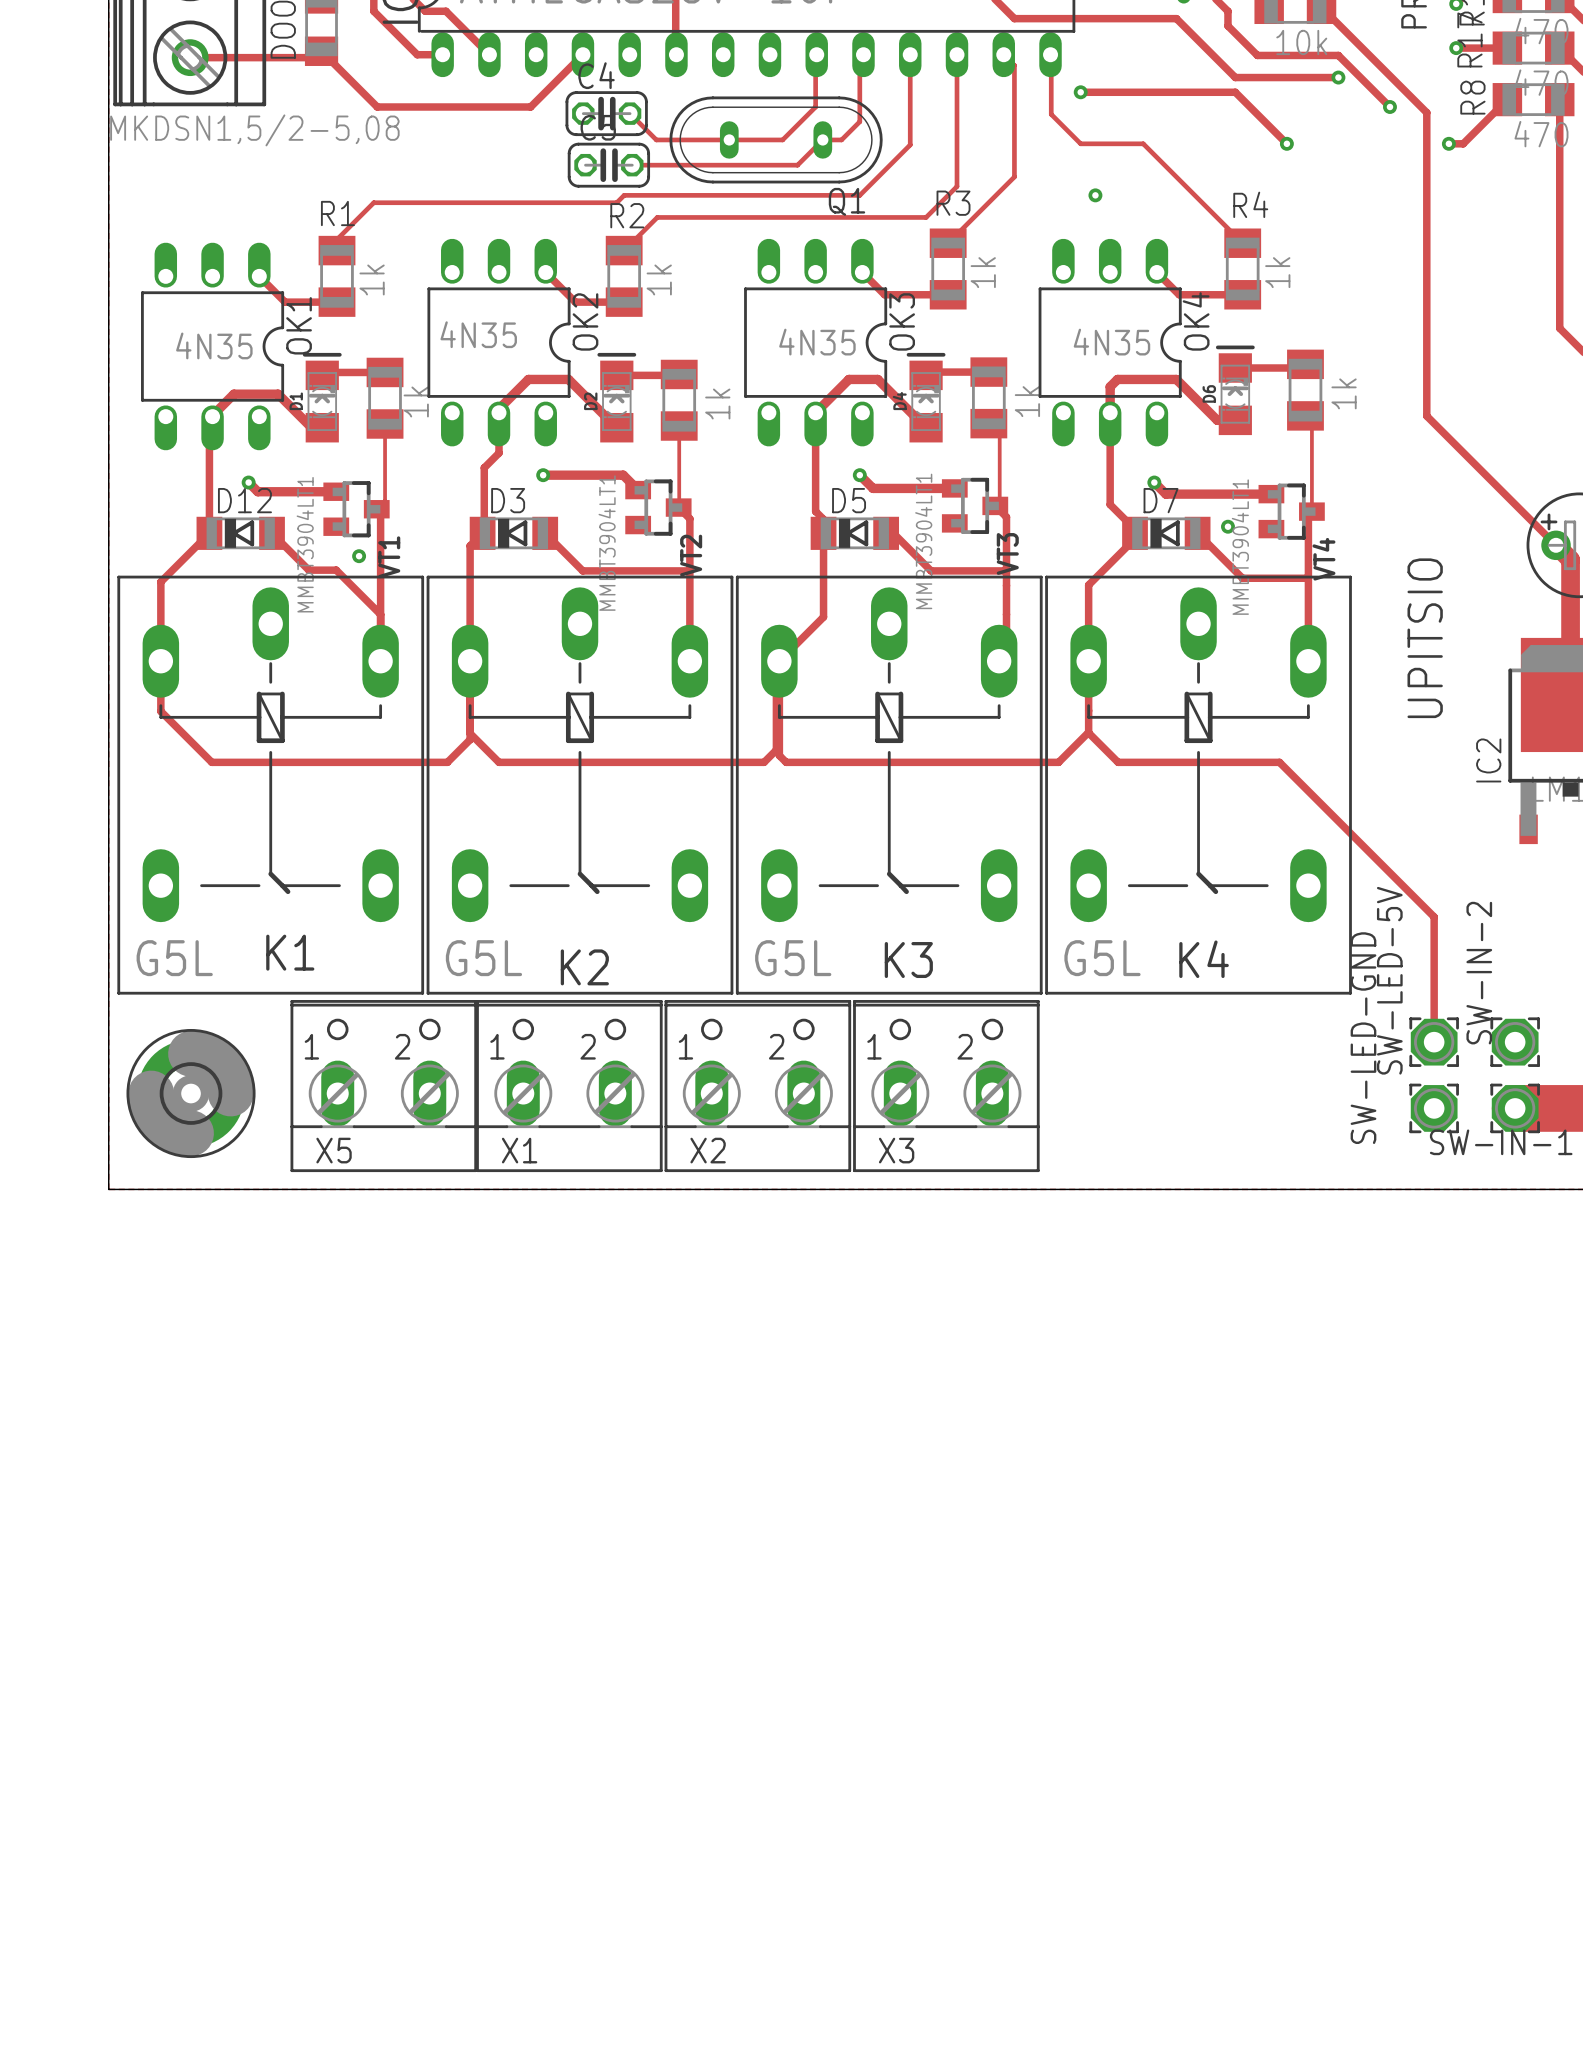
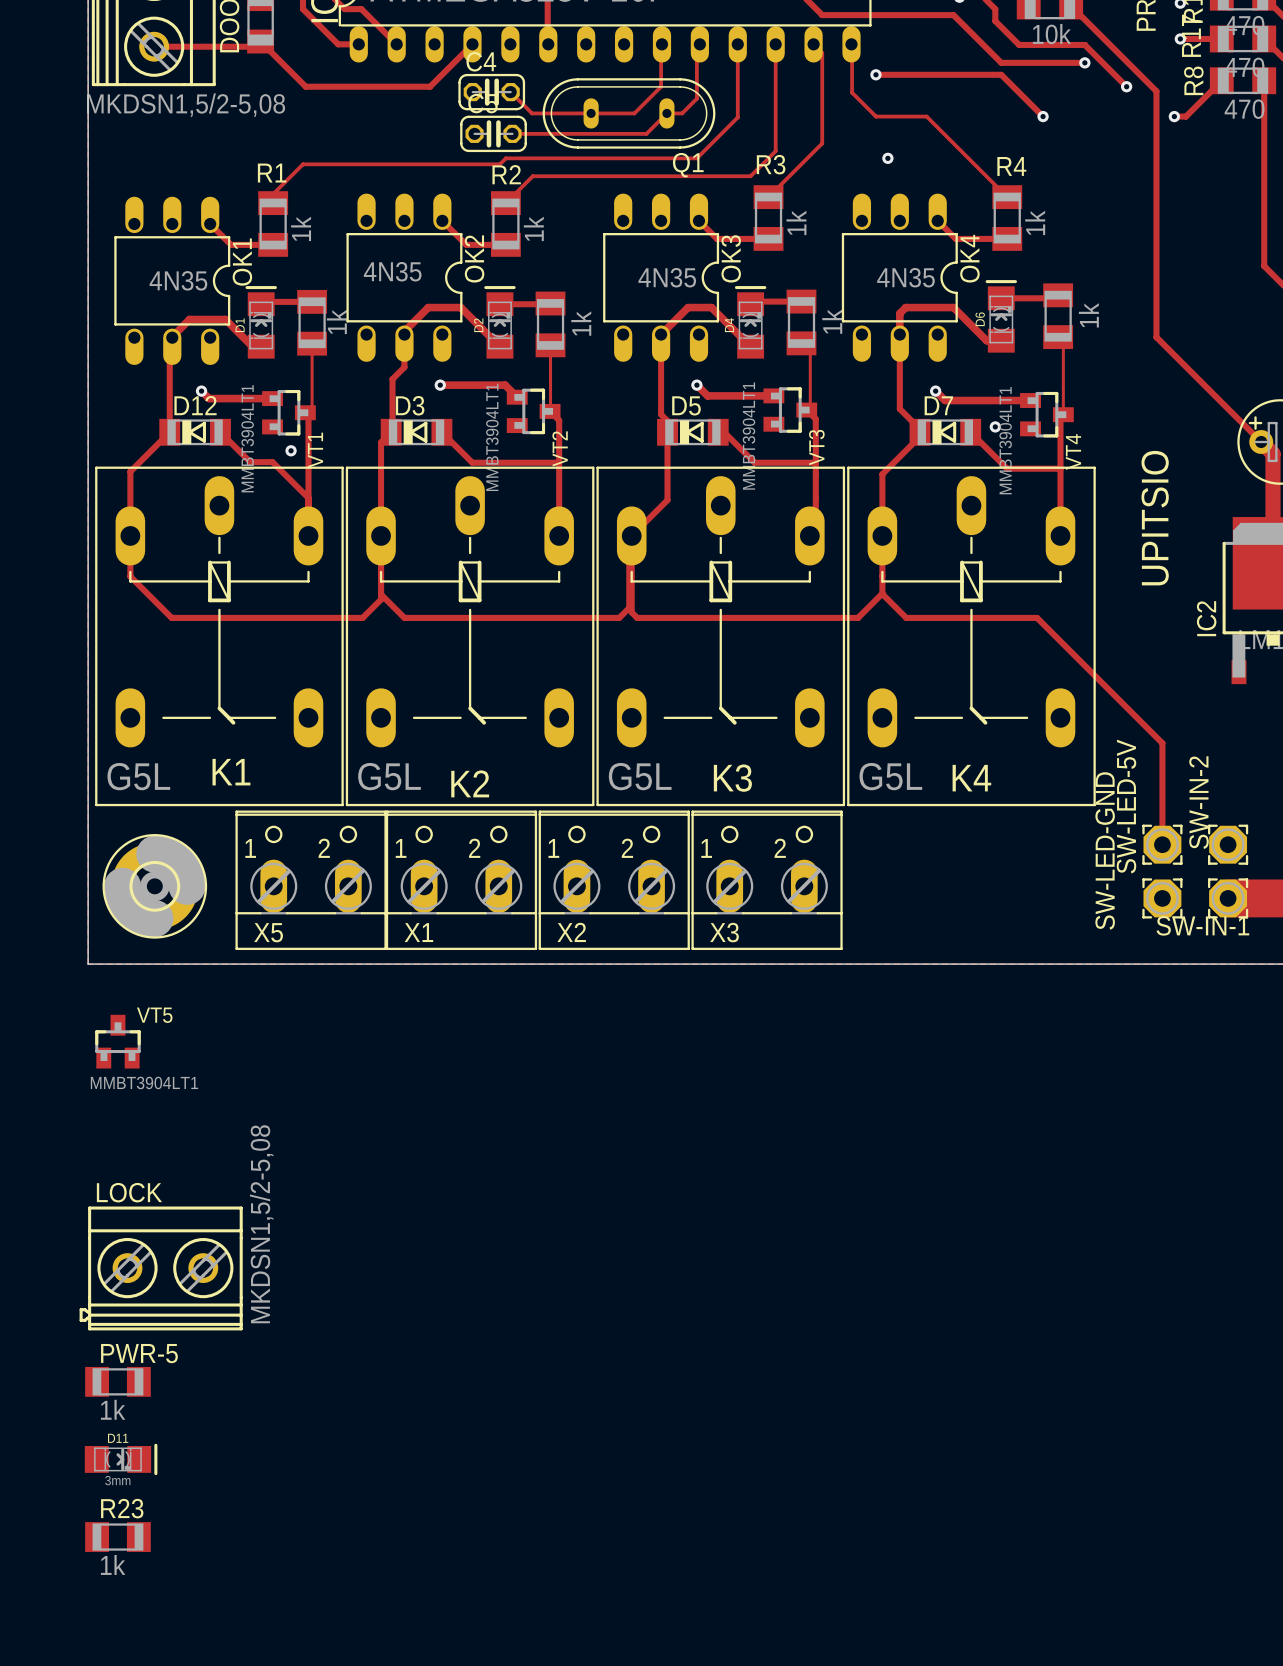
VT5: none -> MMBT3904LT1 (117, 1041)
LOCK: none -> MKDSN1,5/2-5,08 (161, 1268)
PWR-5: none -> 1k (117, 1381)
D11: none -> 3mm (121, 1459)
R23: none -> 1k (117, 1537)

